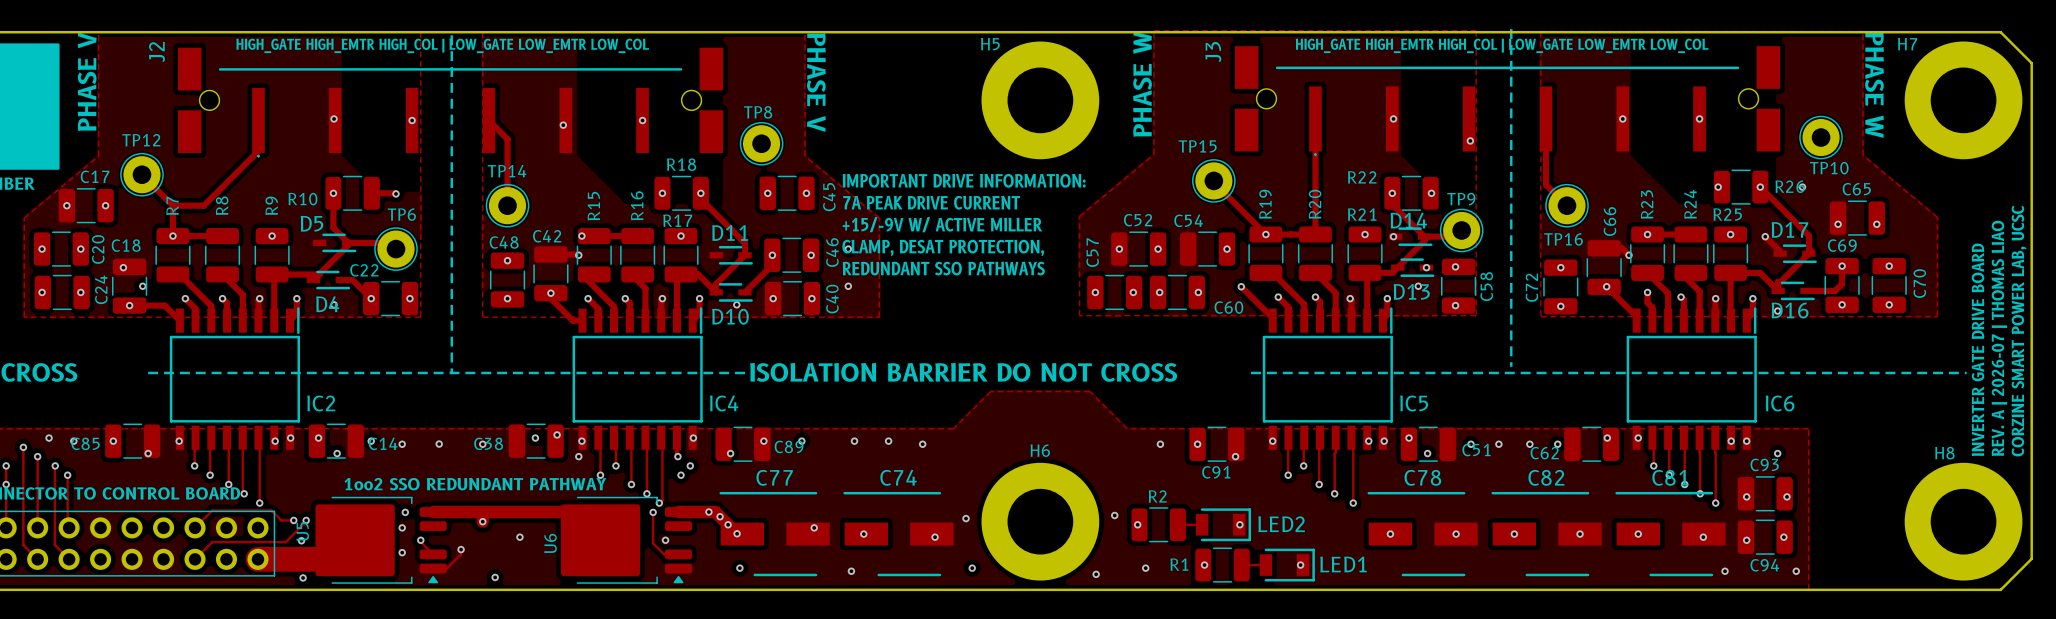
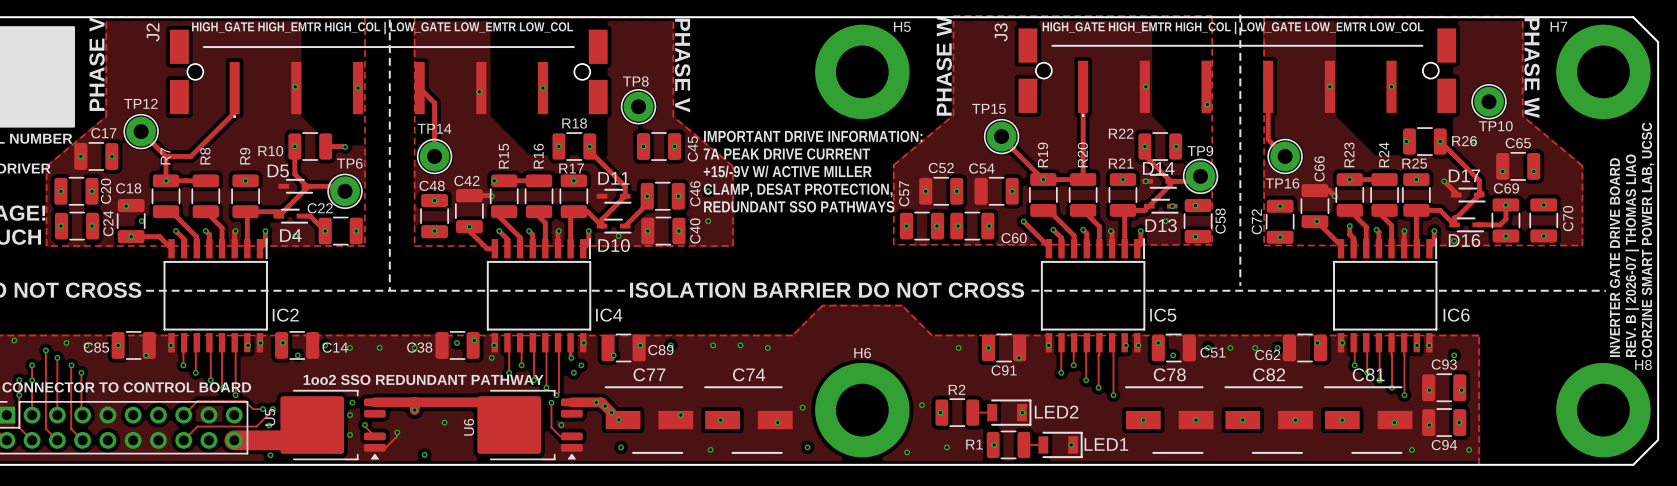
H5 name position: H5 (990, 44) -> H5 (902, 26)
text: REV. A | 2026-07 | THOMAS LIAO (1999, 338) -> REV. B | 2026-07 | THOMAS LIAO (1632, 255)
H8 name position: H8 (1944, 453) -> H8 (1643, 364)

